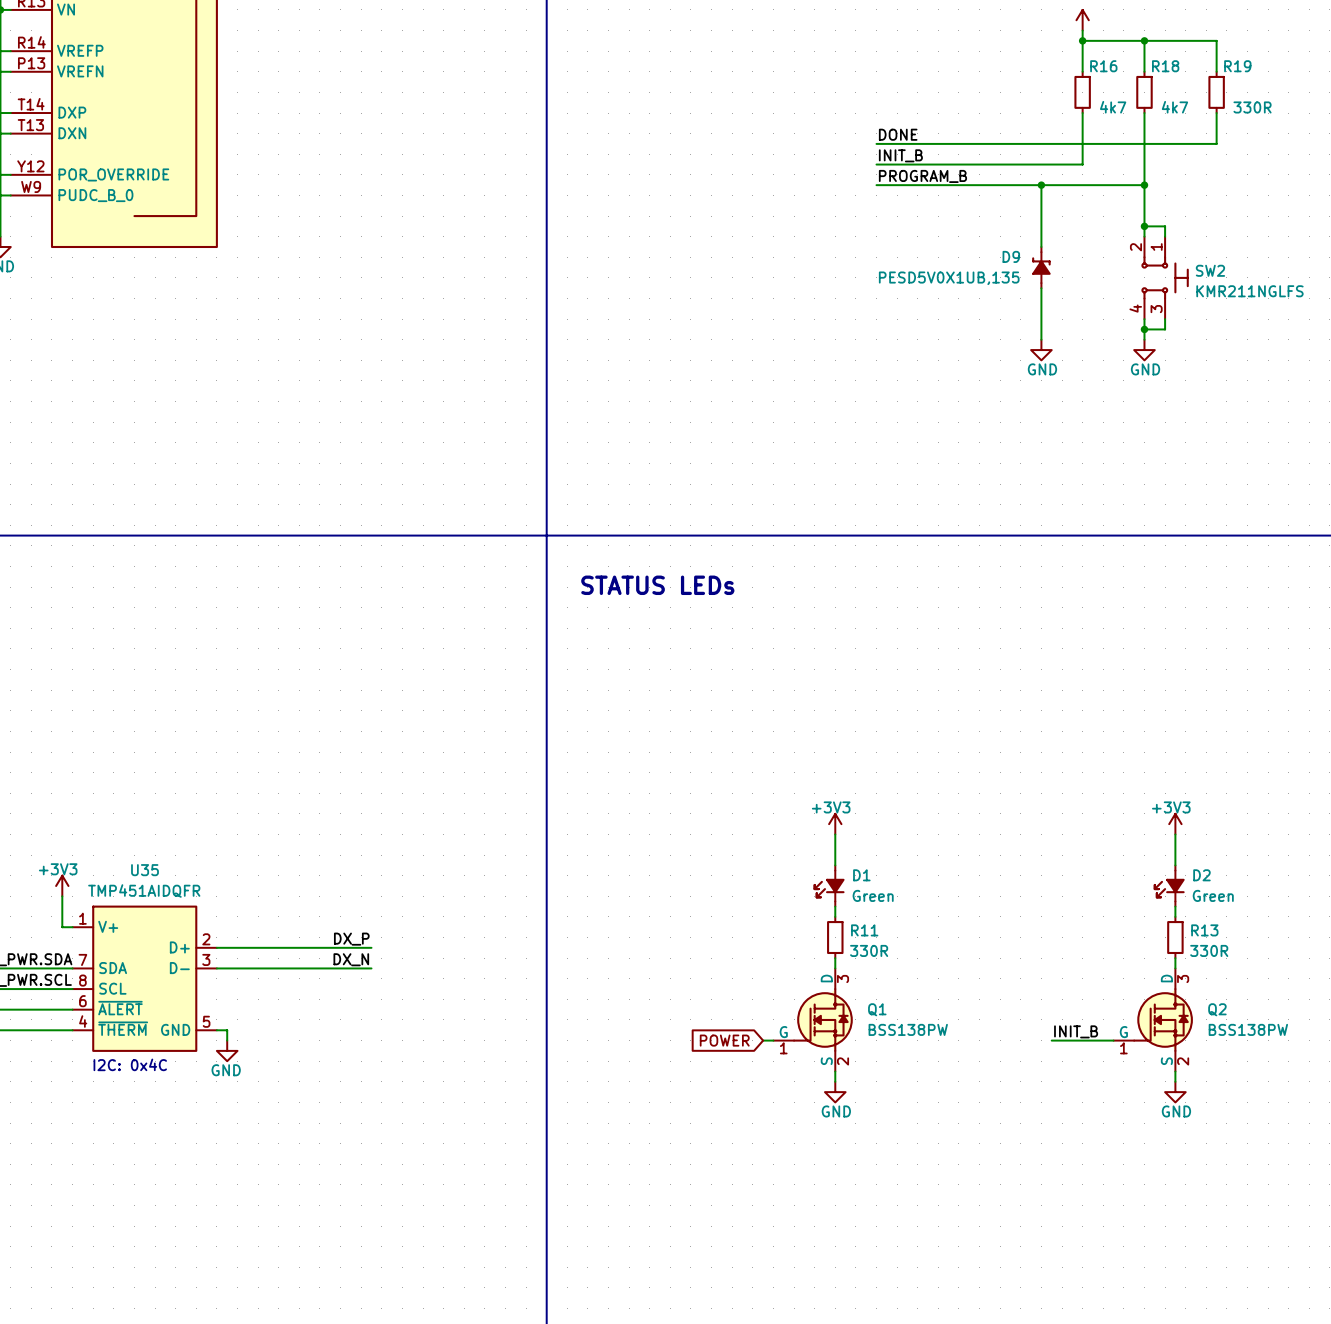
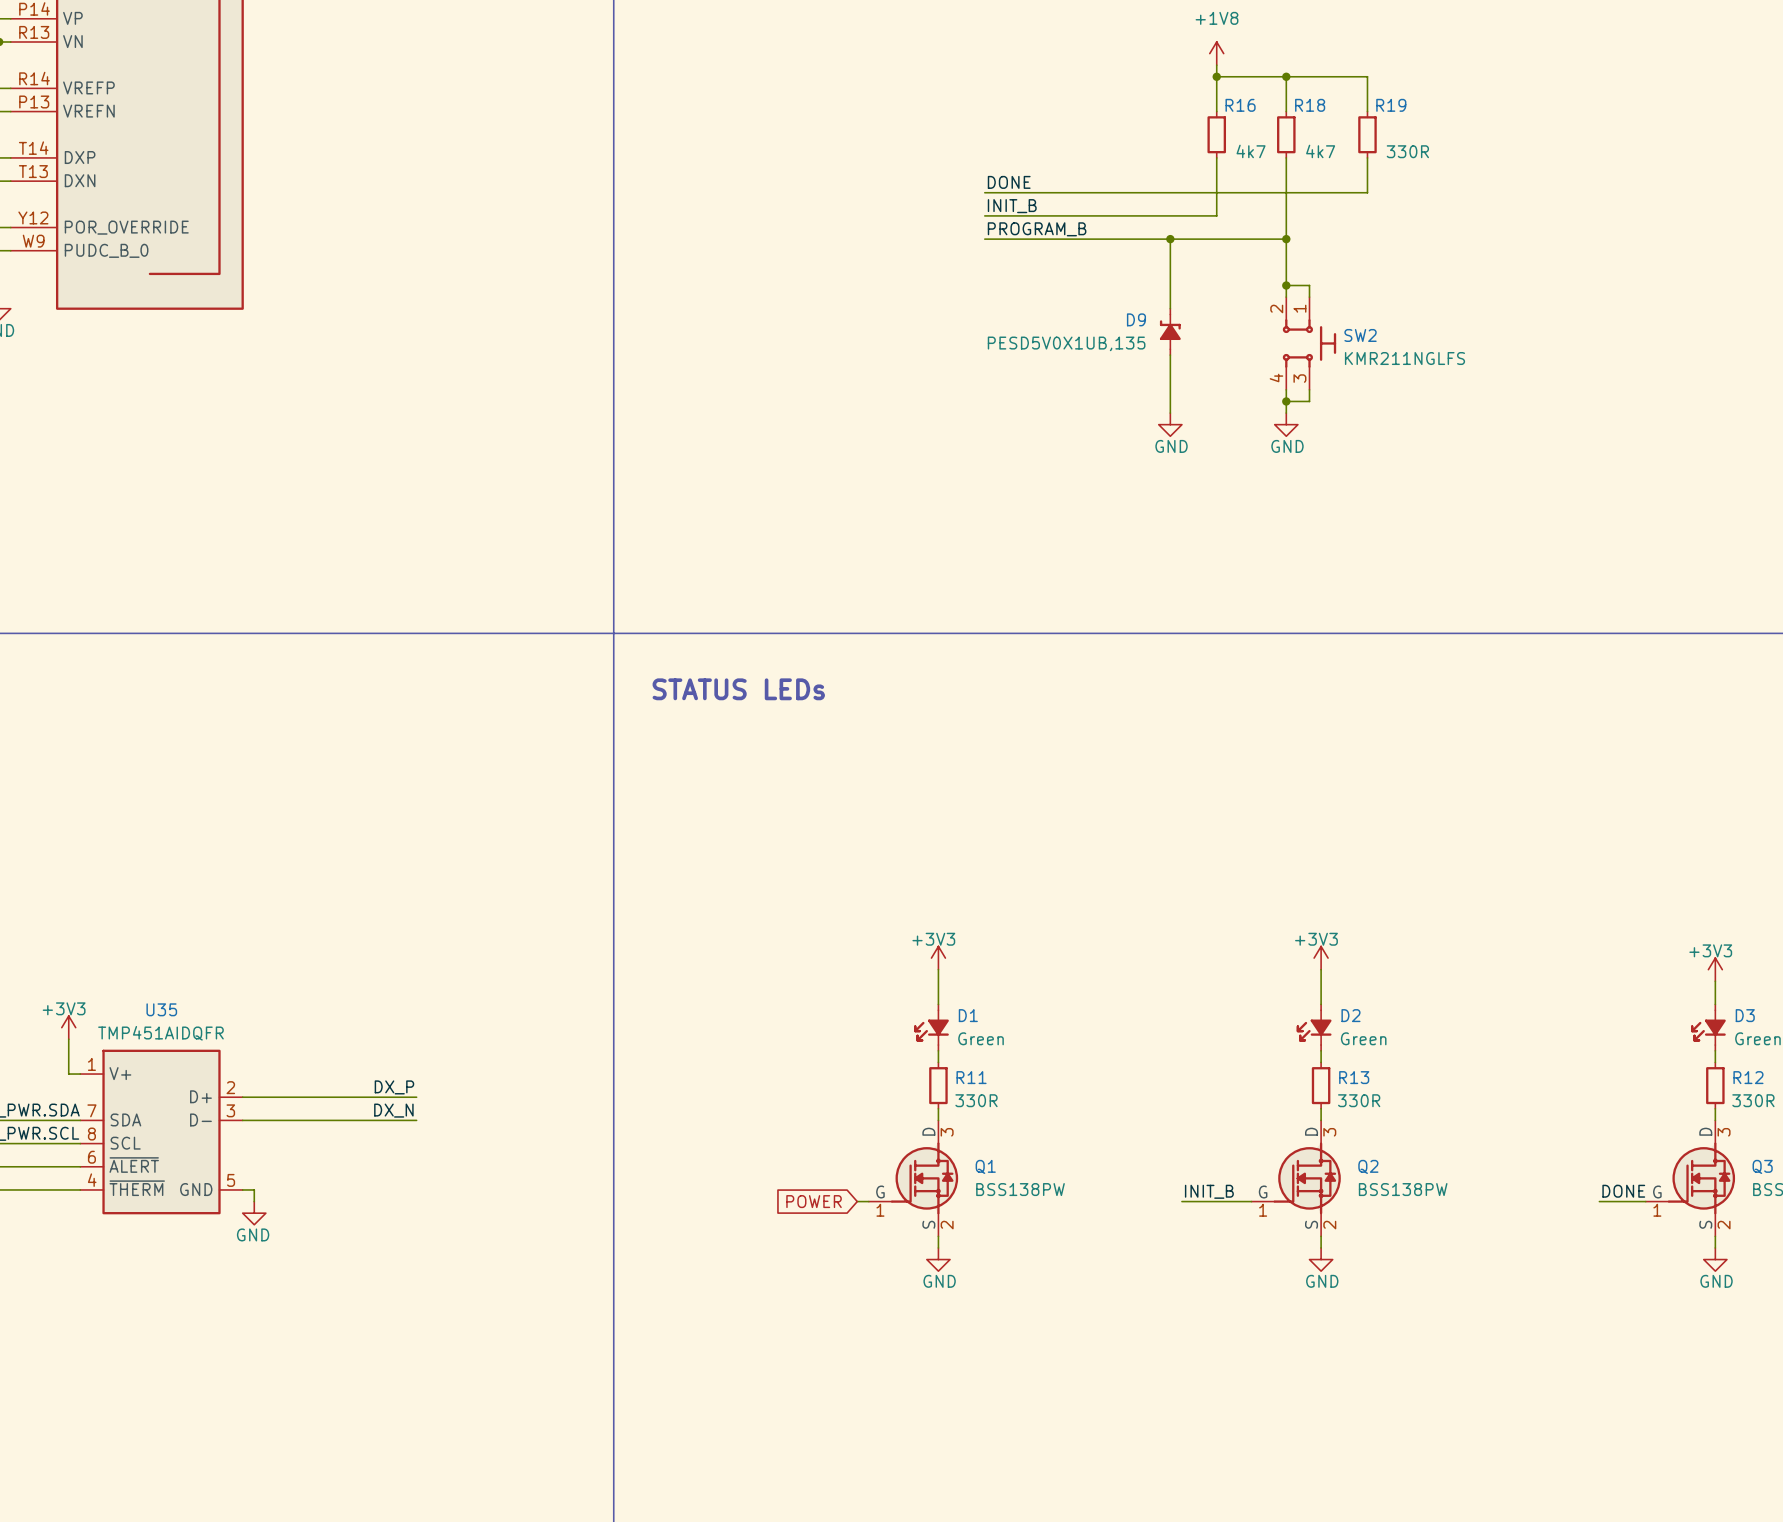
text: I2C: 0x4C (130, 1064) -> none

